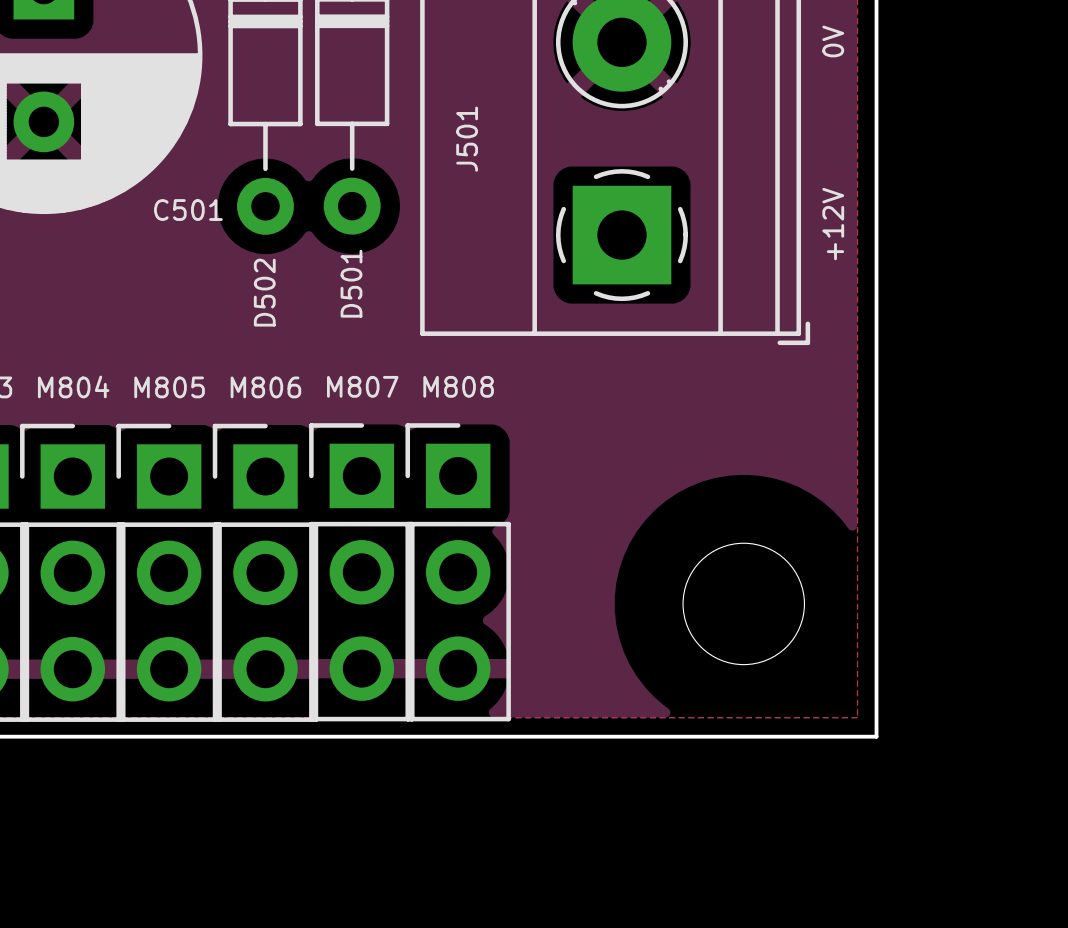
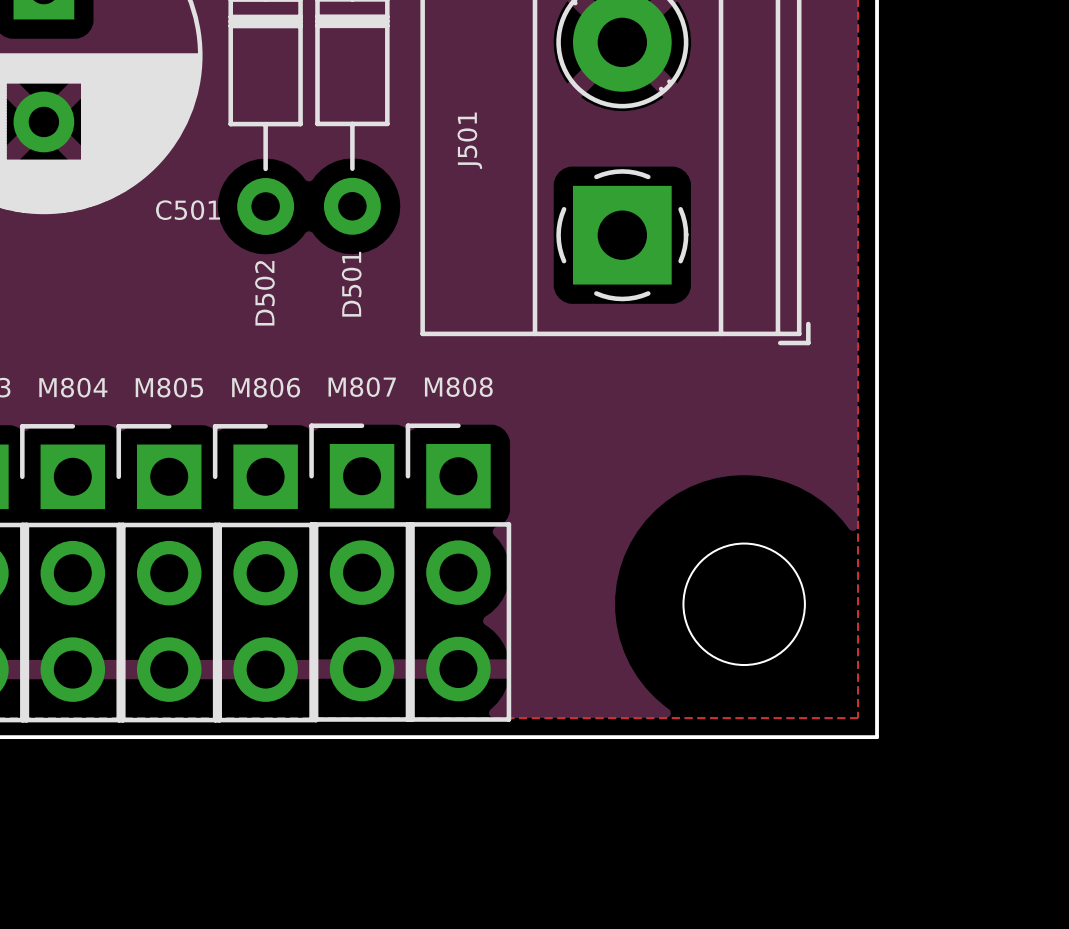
text: 0V (833, 41) -> none
text: +12V (833, 224) -> none

